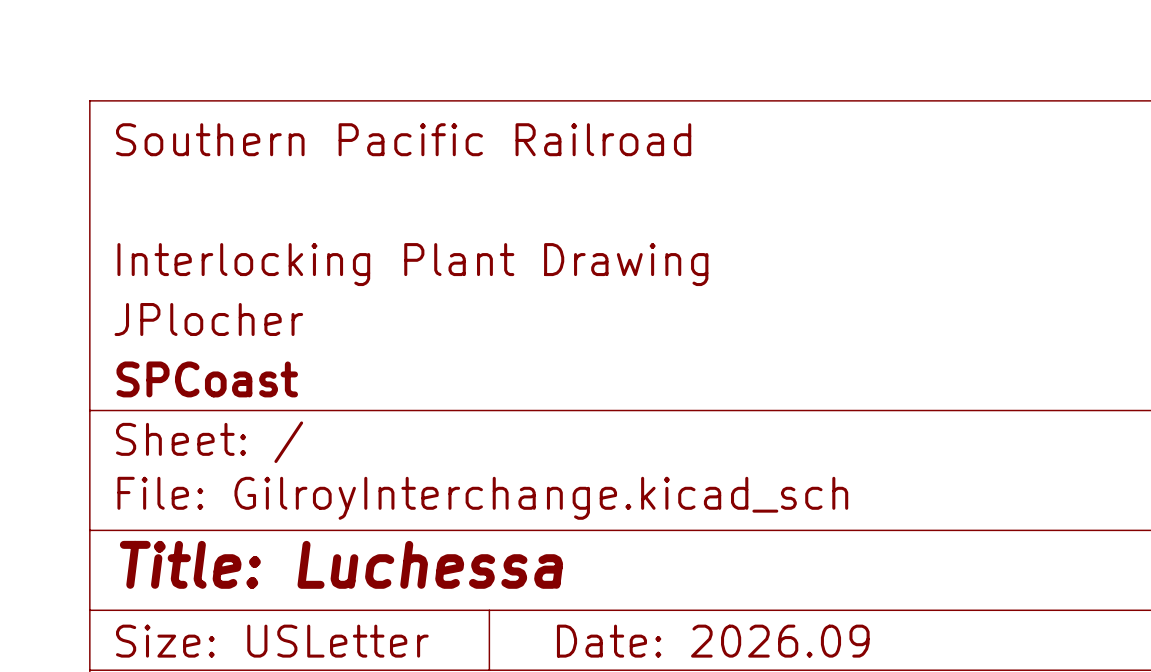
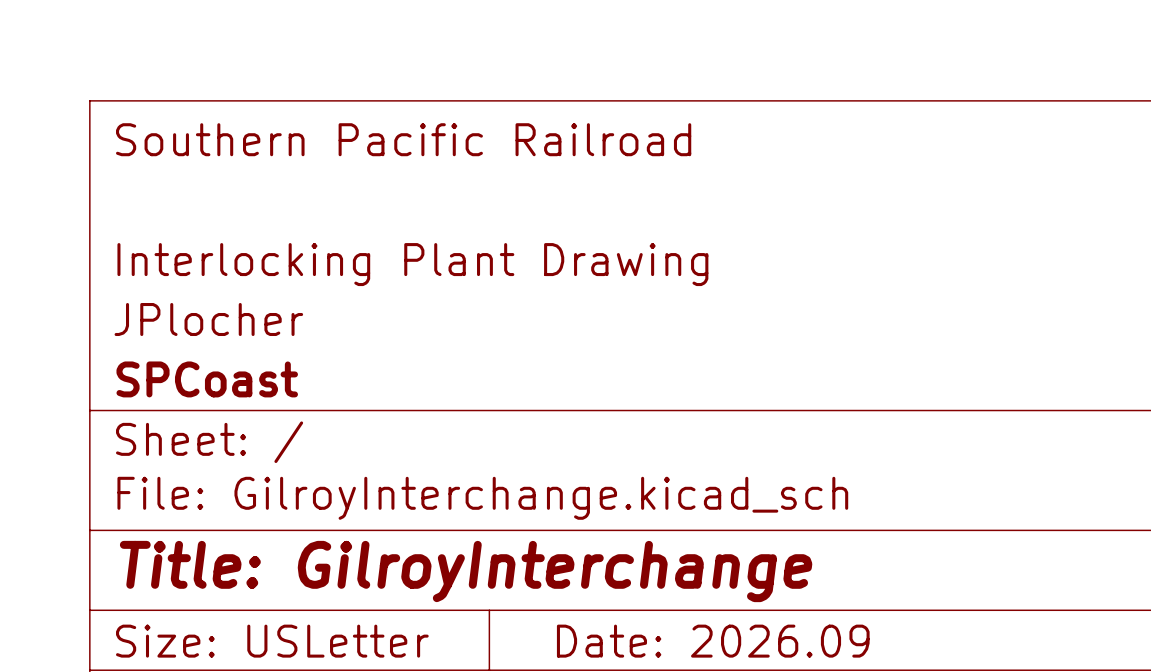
title block: Title: Luchessa (341, 564) -> Title: GilroyInterchange (466, 571)

